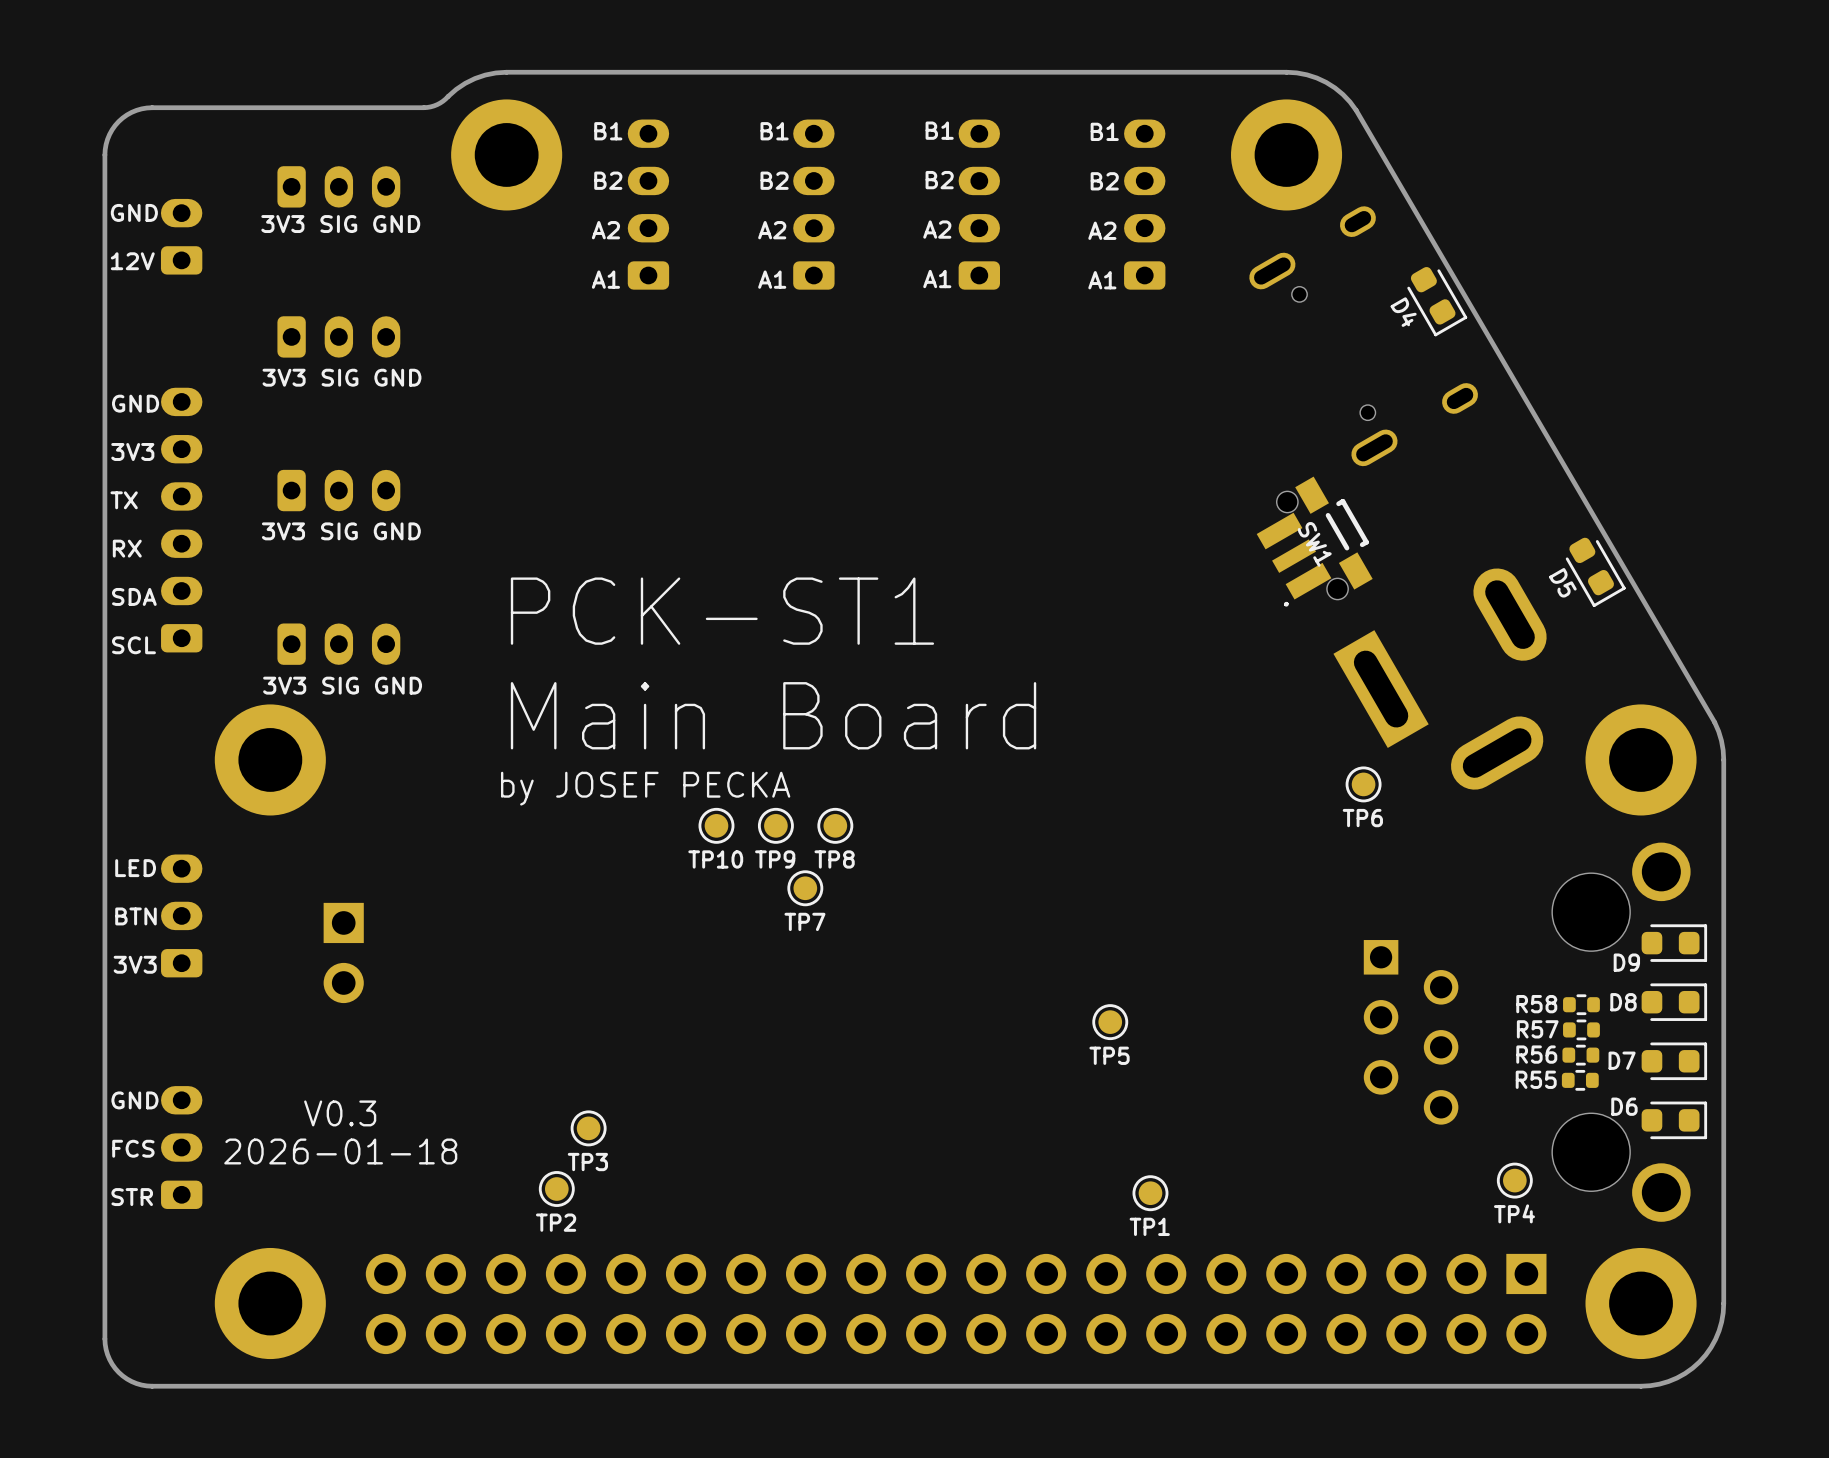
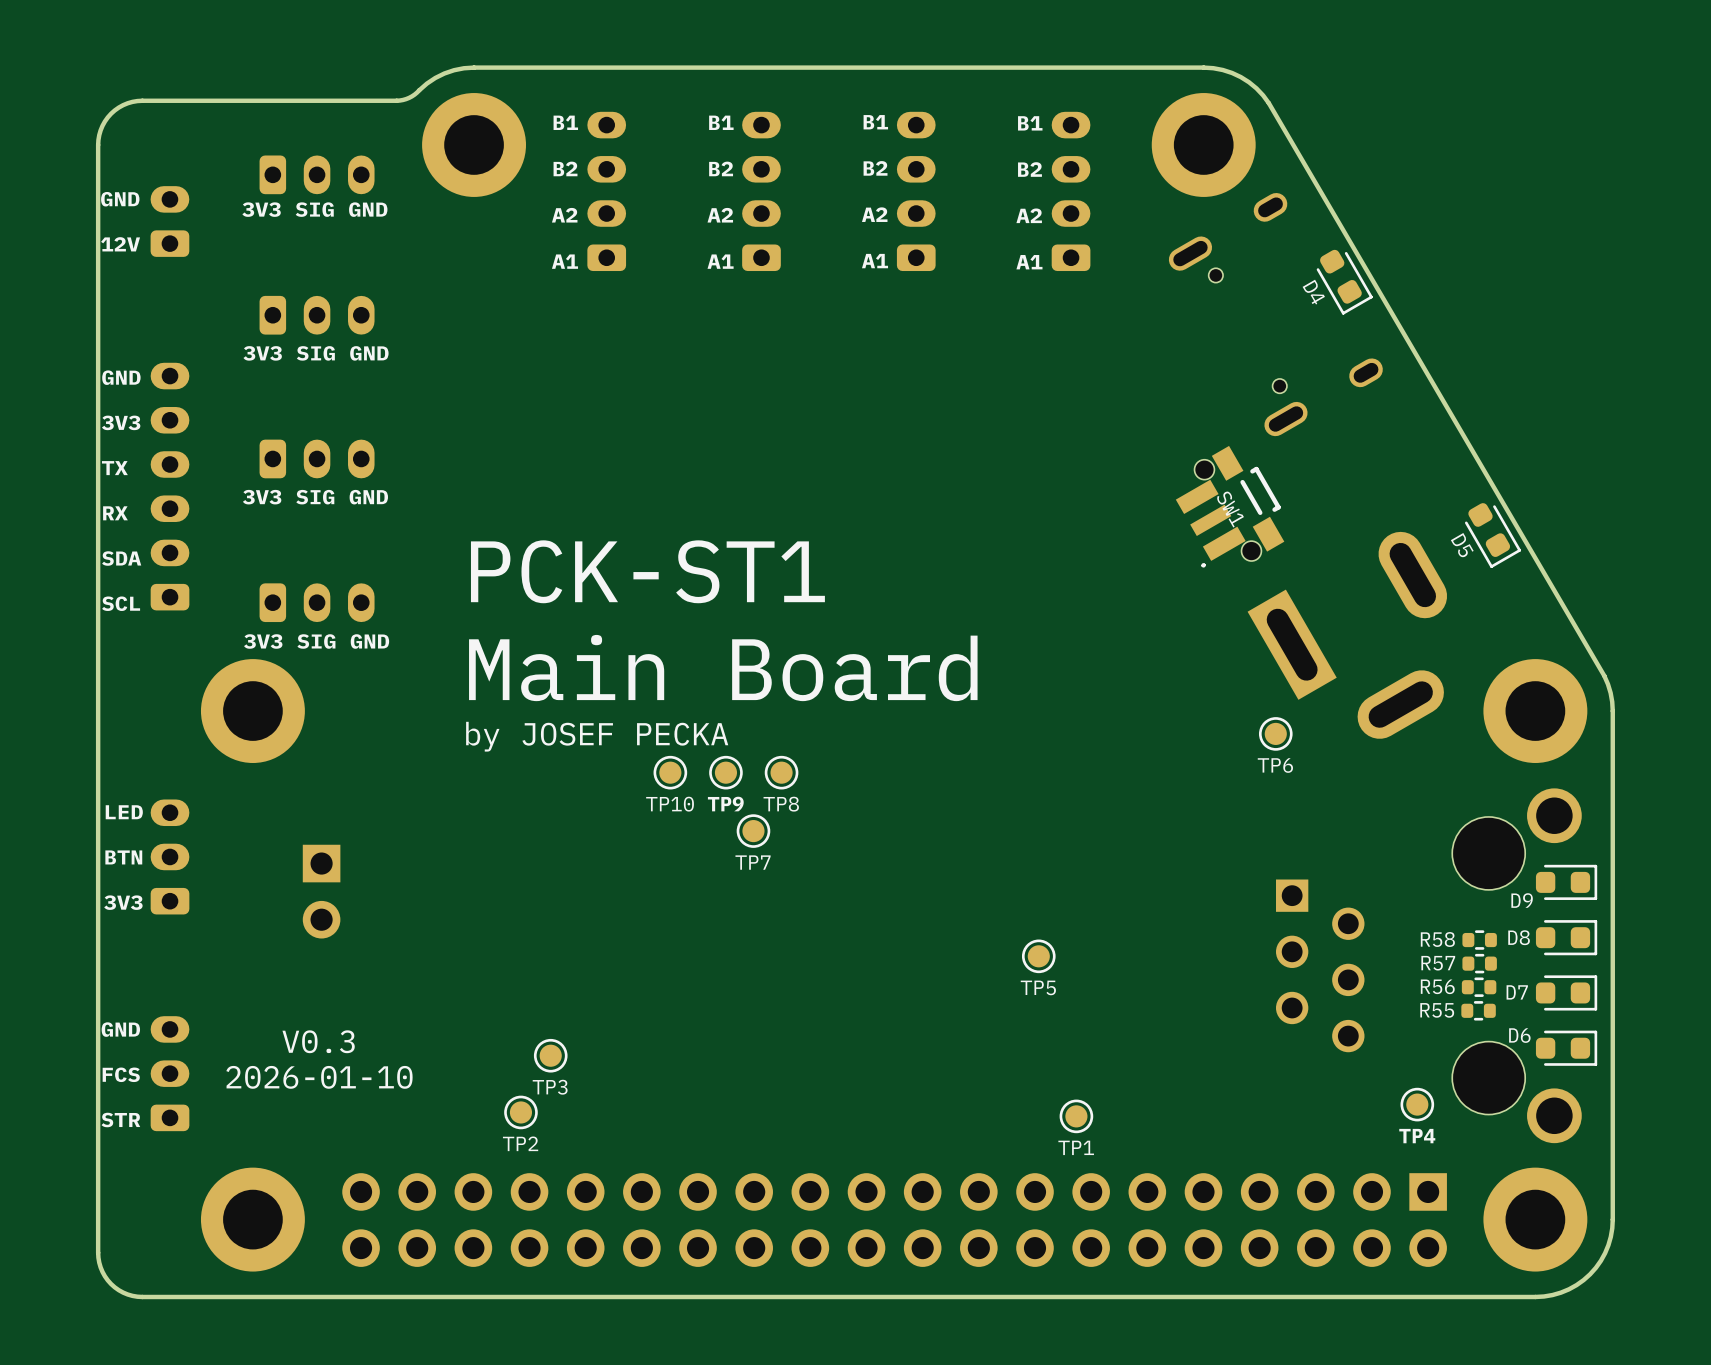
text: 2026-01-18 (340, 1151) -> 2026-01-10 (319, 1077)

